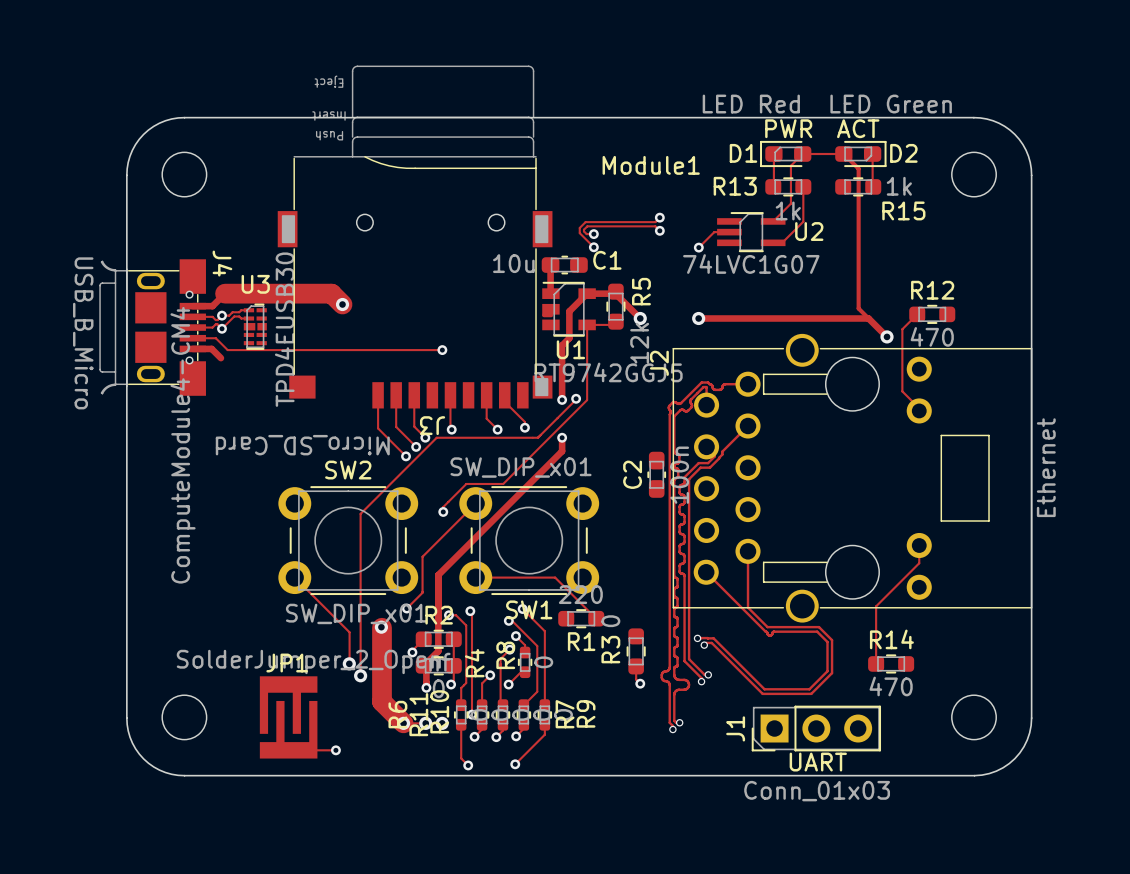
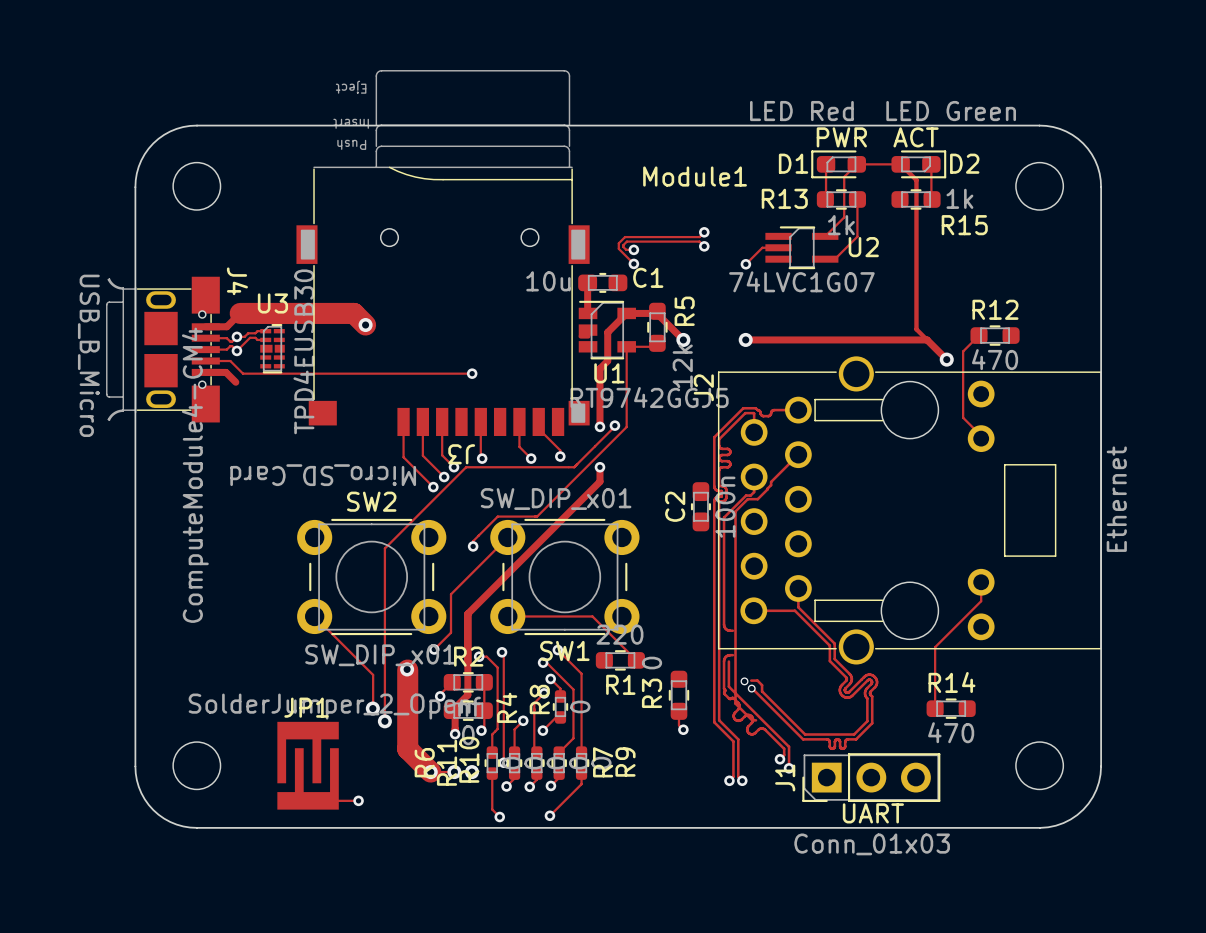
track: (701, 382) (680, 403) (673, 402) (668, 407) (670, 411) (669, 667) (668, 670) (662, 672) (661, 677) (669, 684) (669, 722) (672, 725) (672, 729) -> (748, 408) (743, 408) (714, 437) (714, 487) (716, 490) (721, 490) (721, 496) (716, 497) (714, 501) (714, 722) (733, 741) (733, 776) (729, 780)
track: (703, 387) (690, 399) (691, 406) (688, 410) (681, 409) (674, 416) (674, 451) (679, 456) (679, 462) (674, 466) (678, 470) (678, 476) (674, 480) (674, 576) (677, 579) (677, 586) (674, 589) (674, 596) (677, 599) (677, 606) (674, 609) (674, 616) (677, 618) (677, 625) (674, 628) (674, 635) (677, 638) (674, 655) (677, 658) (677, 665) (674, 667) (674, 674) (677, 679) (687, 680) (689, 684) (686, 689) (677, 690) (674, 693) (674, 720) (679, 722) -> (750, 413) (745, 413) (719, 439) (719, 447) (728, 449) (730, 451) (728, 454) (720, 455) (719, 458) (720, 460) (728, 461) (730, 464) (728, 467) (720, 467) (719, 470) (719, 486) (723, 486) (726, 490) (725, 499) (719, 501) (719, 720) (738, 739) (738, 776) (742, 780)
track: (706, 446) (714, 456) (708, 463) (698, 463) (684, 477) (684, 483) (679, 487) (679, 493) (684, 497) (684, 503) (679, 507) (679, 513) (684, 516) (684, 522) (679, 526) (679, 532) (684, 536) (684, 542) (679, 546) (679, 552) (684, 556) (684, 562) (679, 566) (679, 572) (684, 576) (684, 661) (701, 678) (701, 681) -> (754, 476) (754, 492) (750, 495) (746, 495) (724, 517) (724, 624) (726, 629) (732, 630)
track: (748, 569) (748, 607) (767, 627) (819, 627) (832, 640) (832, 673) (811, 693) (762, 693) (711, 642) (704, 645) -> (798, 607) (834, 643) (834, 659) (851, 678) (850, 682) (844, 689) (845, 691) (848, 692) (867, 675) (871, 675) (876, 678) (876, 684) (870, 692) (872, 696) (872, 723) (856, 739) (846, 739) (844, 748) (840, 747) (839, 740) (837, 739) (835, 740) (834, 747) (831, 748) (827, 739) (803, 739) (753, 689)
track: (706, 572) (768, 635) (774, 631) (817, 631) (827, 642) (827, 671) (809, 689) (764, 689) (713, 638) (697, 638) -> (753, 610) (794, 610) (829, 645) (829, 661) (846, 678) (839, 689) (843, 696) (851, 696) (867, 680) (871, 680) (871, 683) (865, 692) (867, 698) (867, 721) (854, 734) (805, 734) (762, 691) (762, 685) (757, 680) (751, 680)
track: none -> (732, 655) (727, 655) (724, 659) (724, 688) (724, 694) (729, 698) (733, 698) (739, 704) (733, 717) (738, 720) (746, 715) (751, 716) (752, 721) (747, 727) (747, 732) (752, 734) (760, 728) (765, 729) (784, 748) (784, 755) (779, 759)
track: none -> (728, 661) (728, 686) (789, 746) (789, 768)
via: (708, 674) -> none
via: (701, 681) -> none
via: none -> (779, 759)
via: none -> (789, 768)
via: (679, 722) -> none
via: (672, 729) -> none
via: none -> (729, 780)
via: none -> (742, 780)

